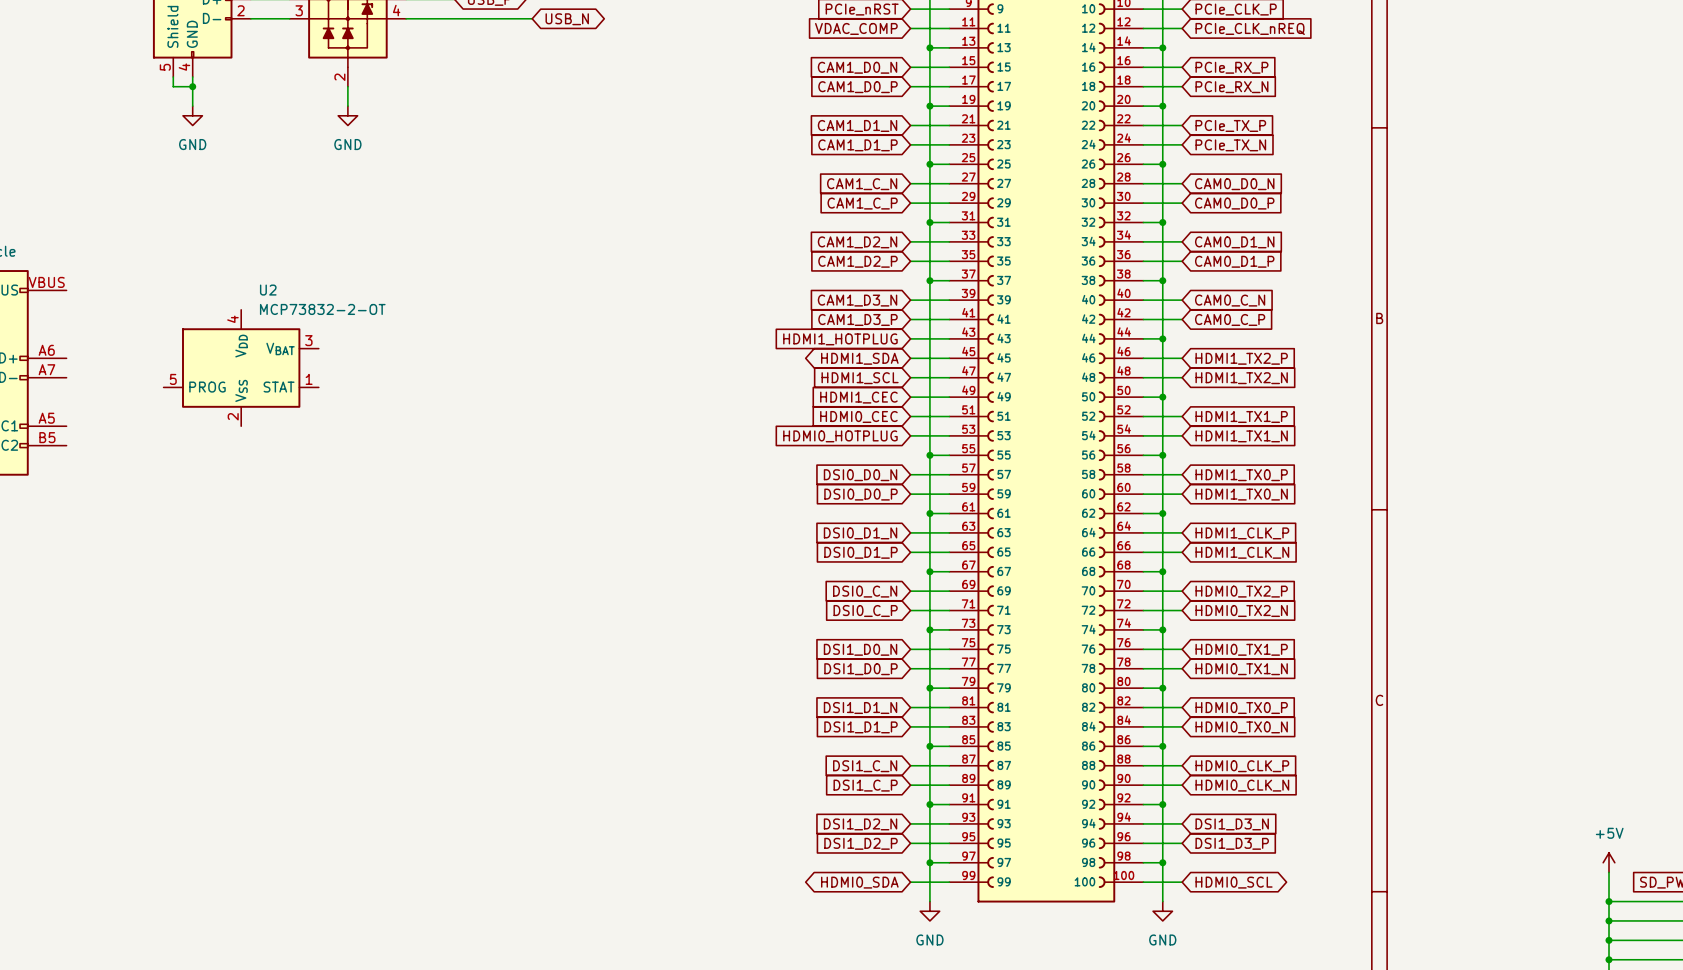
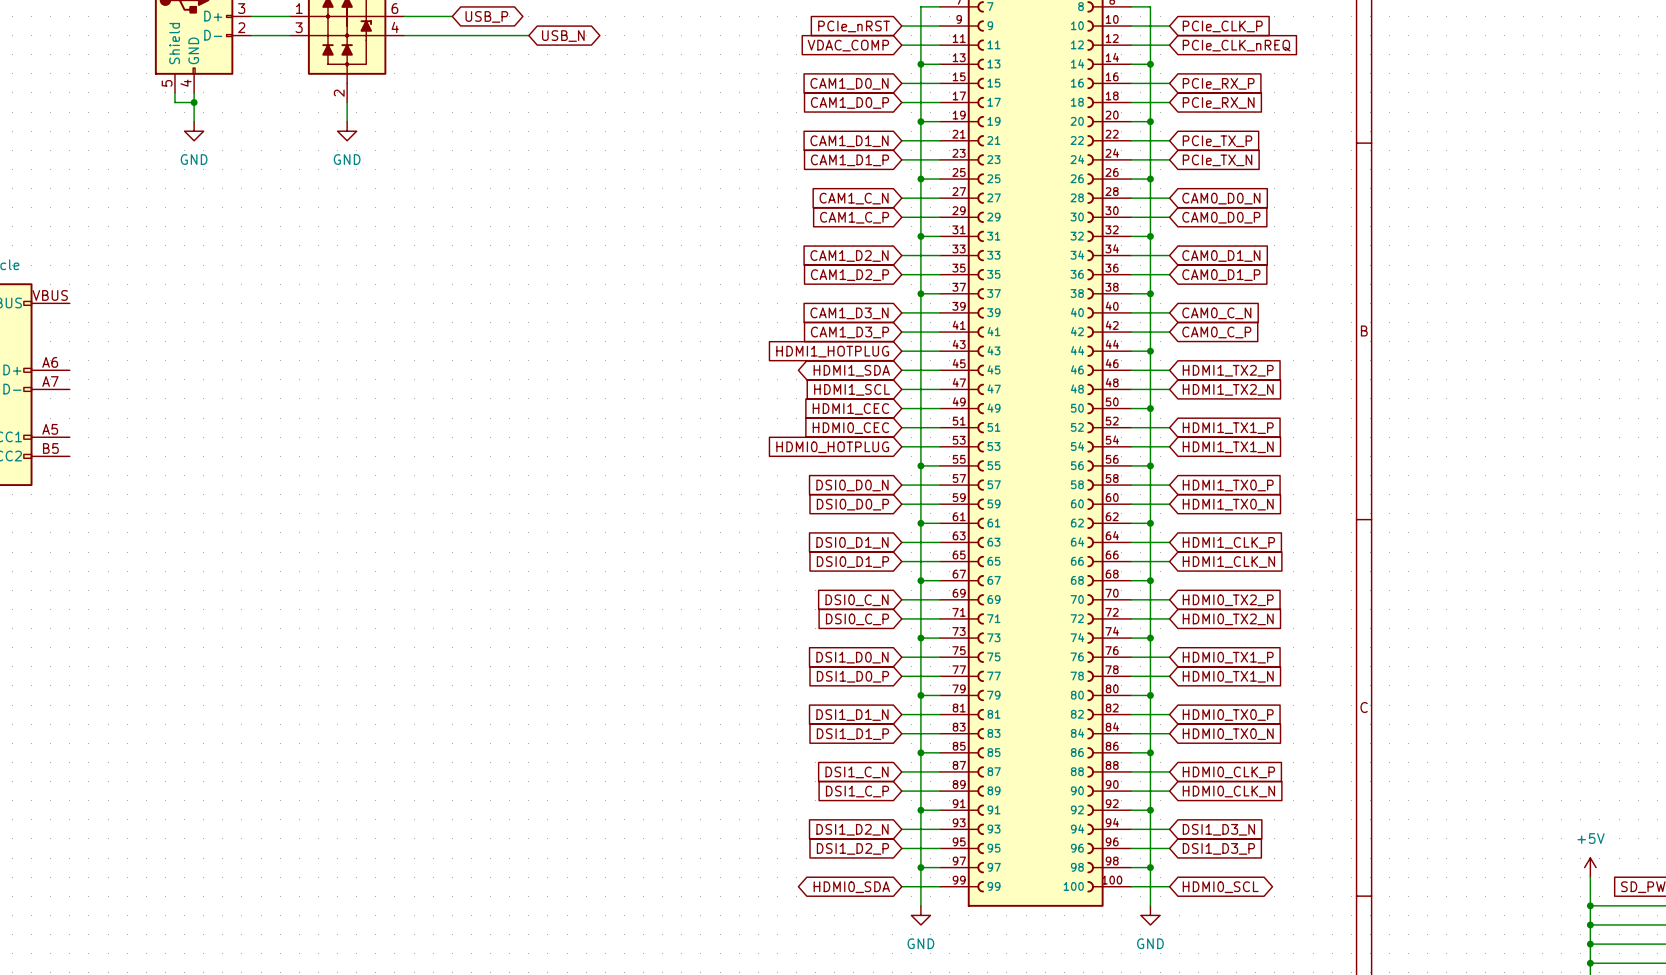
U2: MCP73832-2-OT (241, 368) -> none

